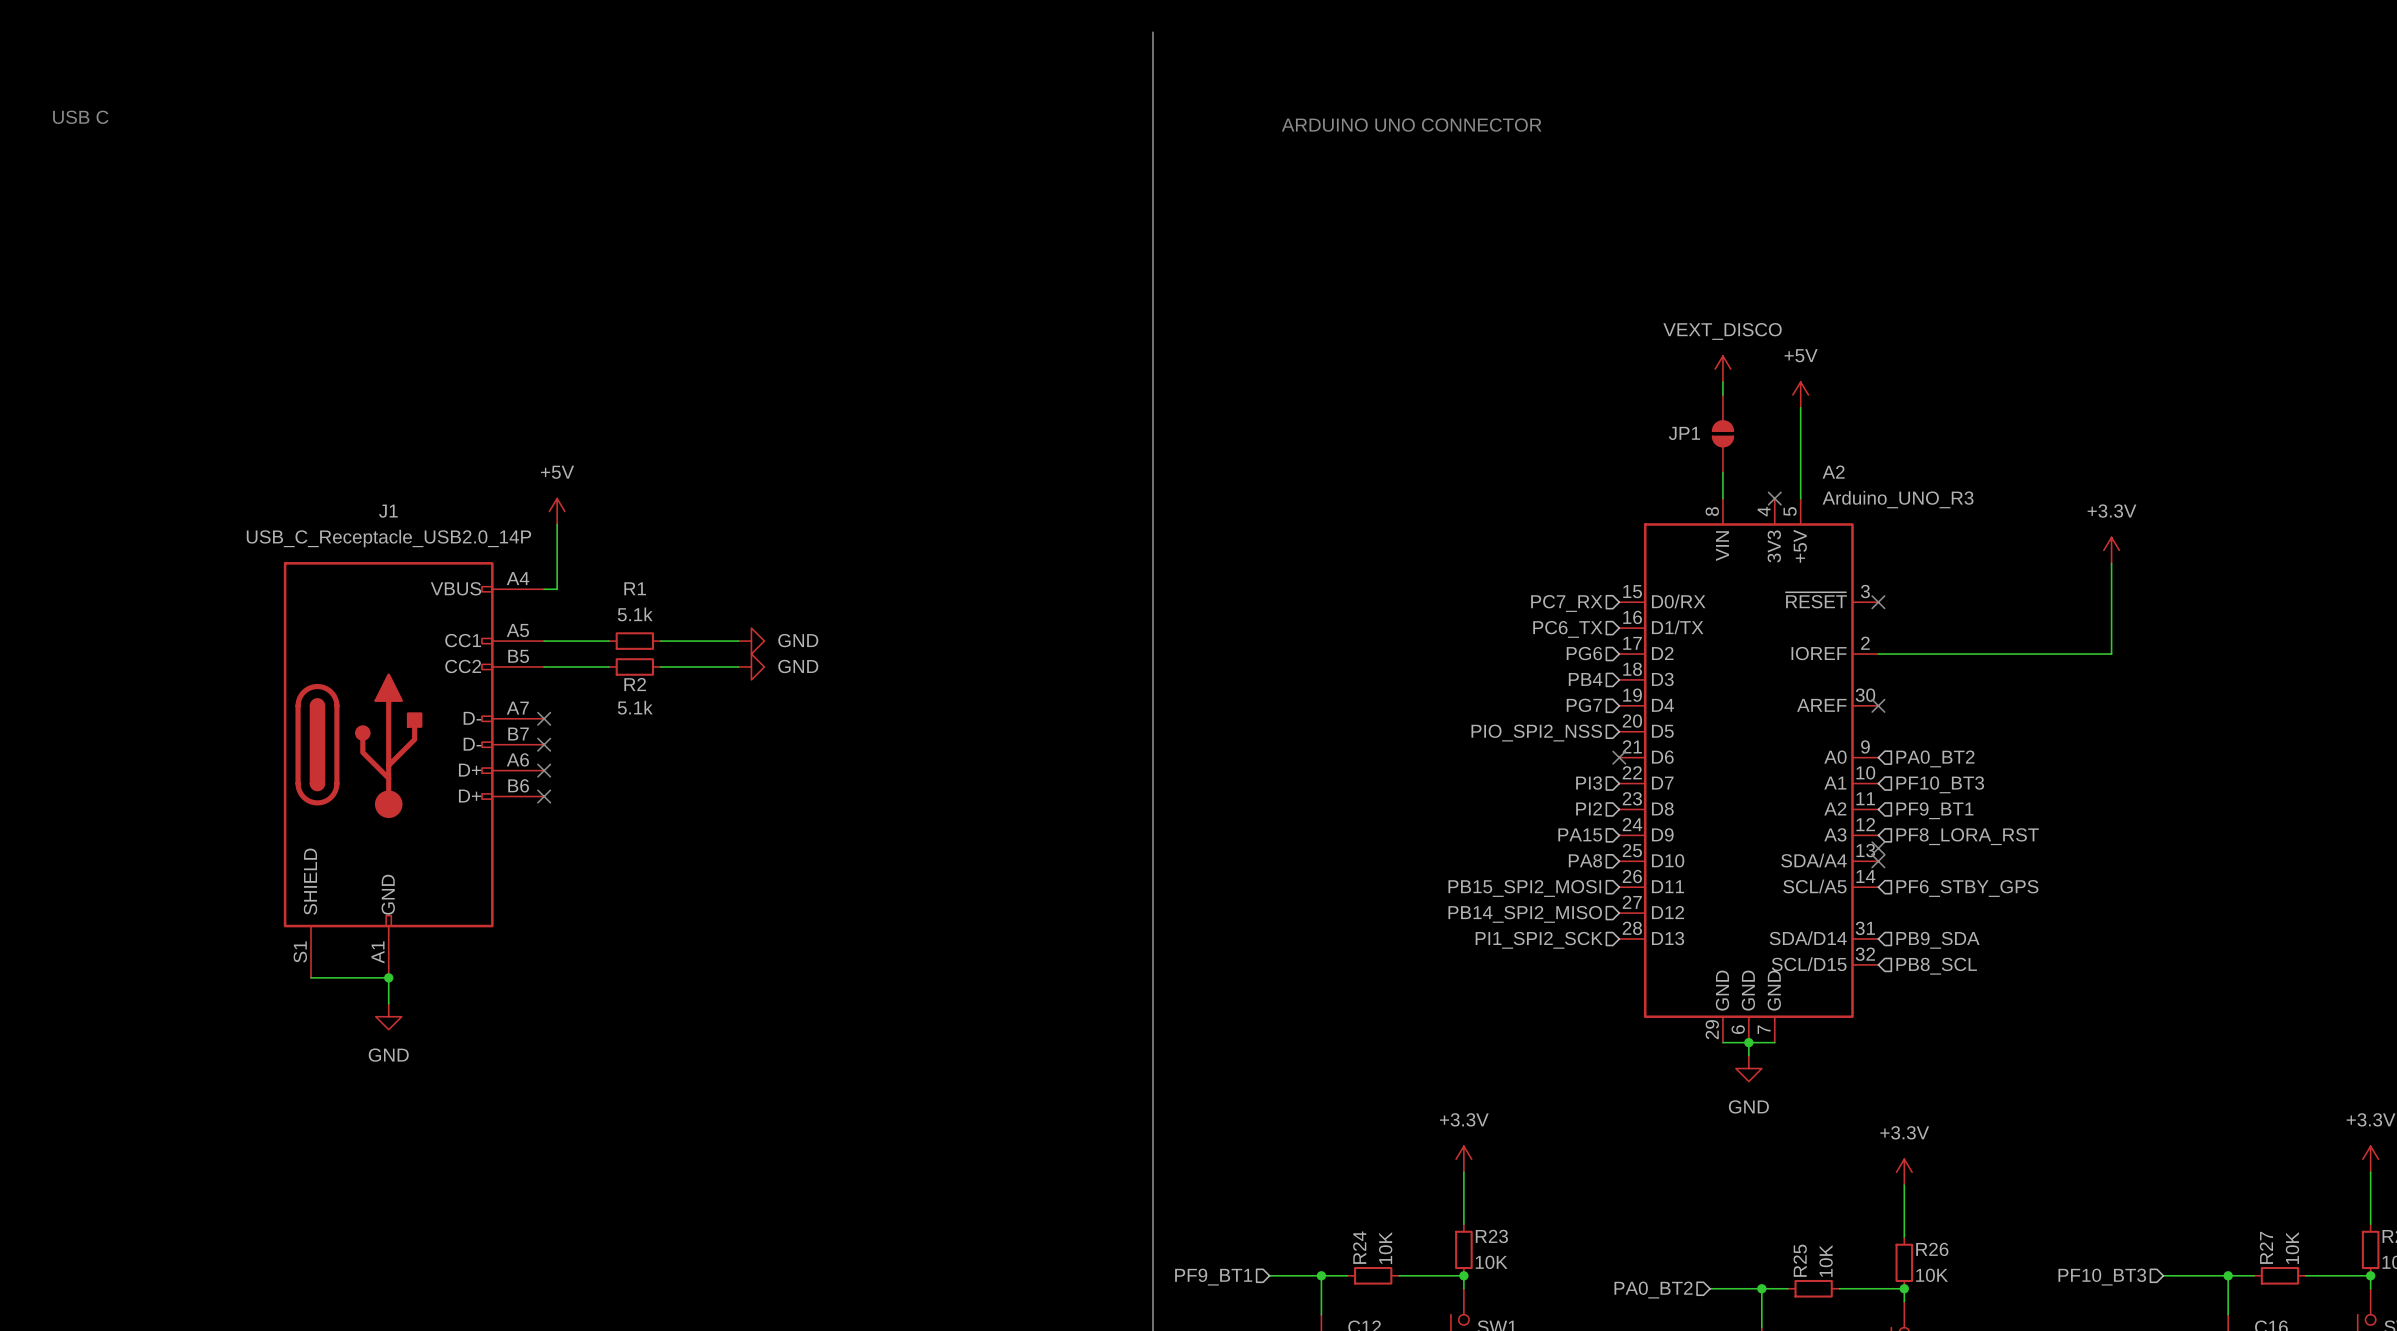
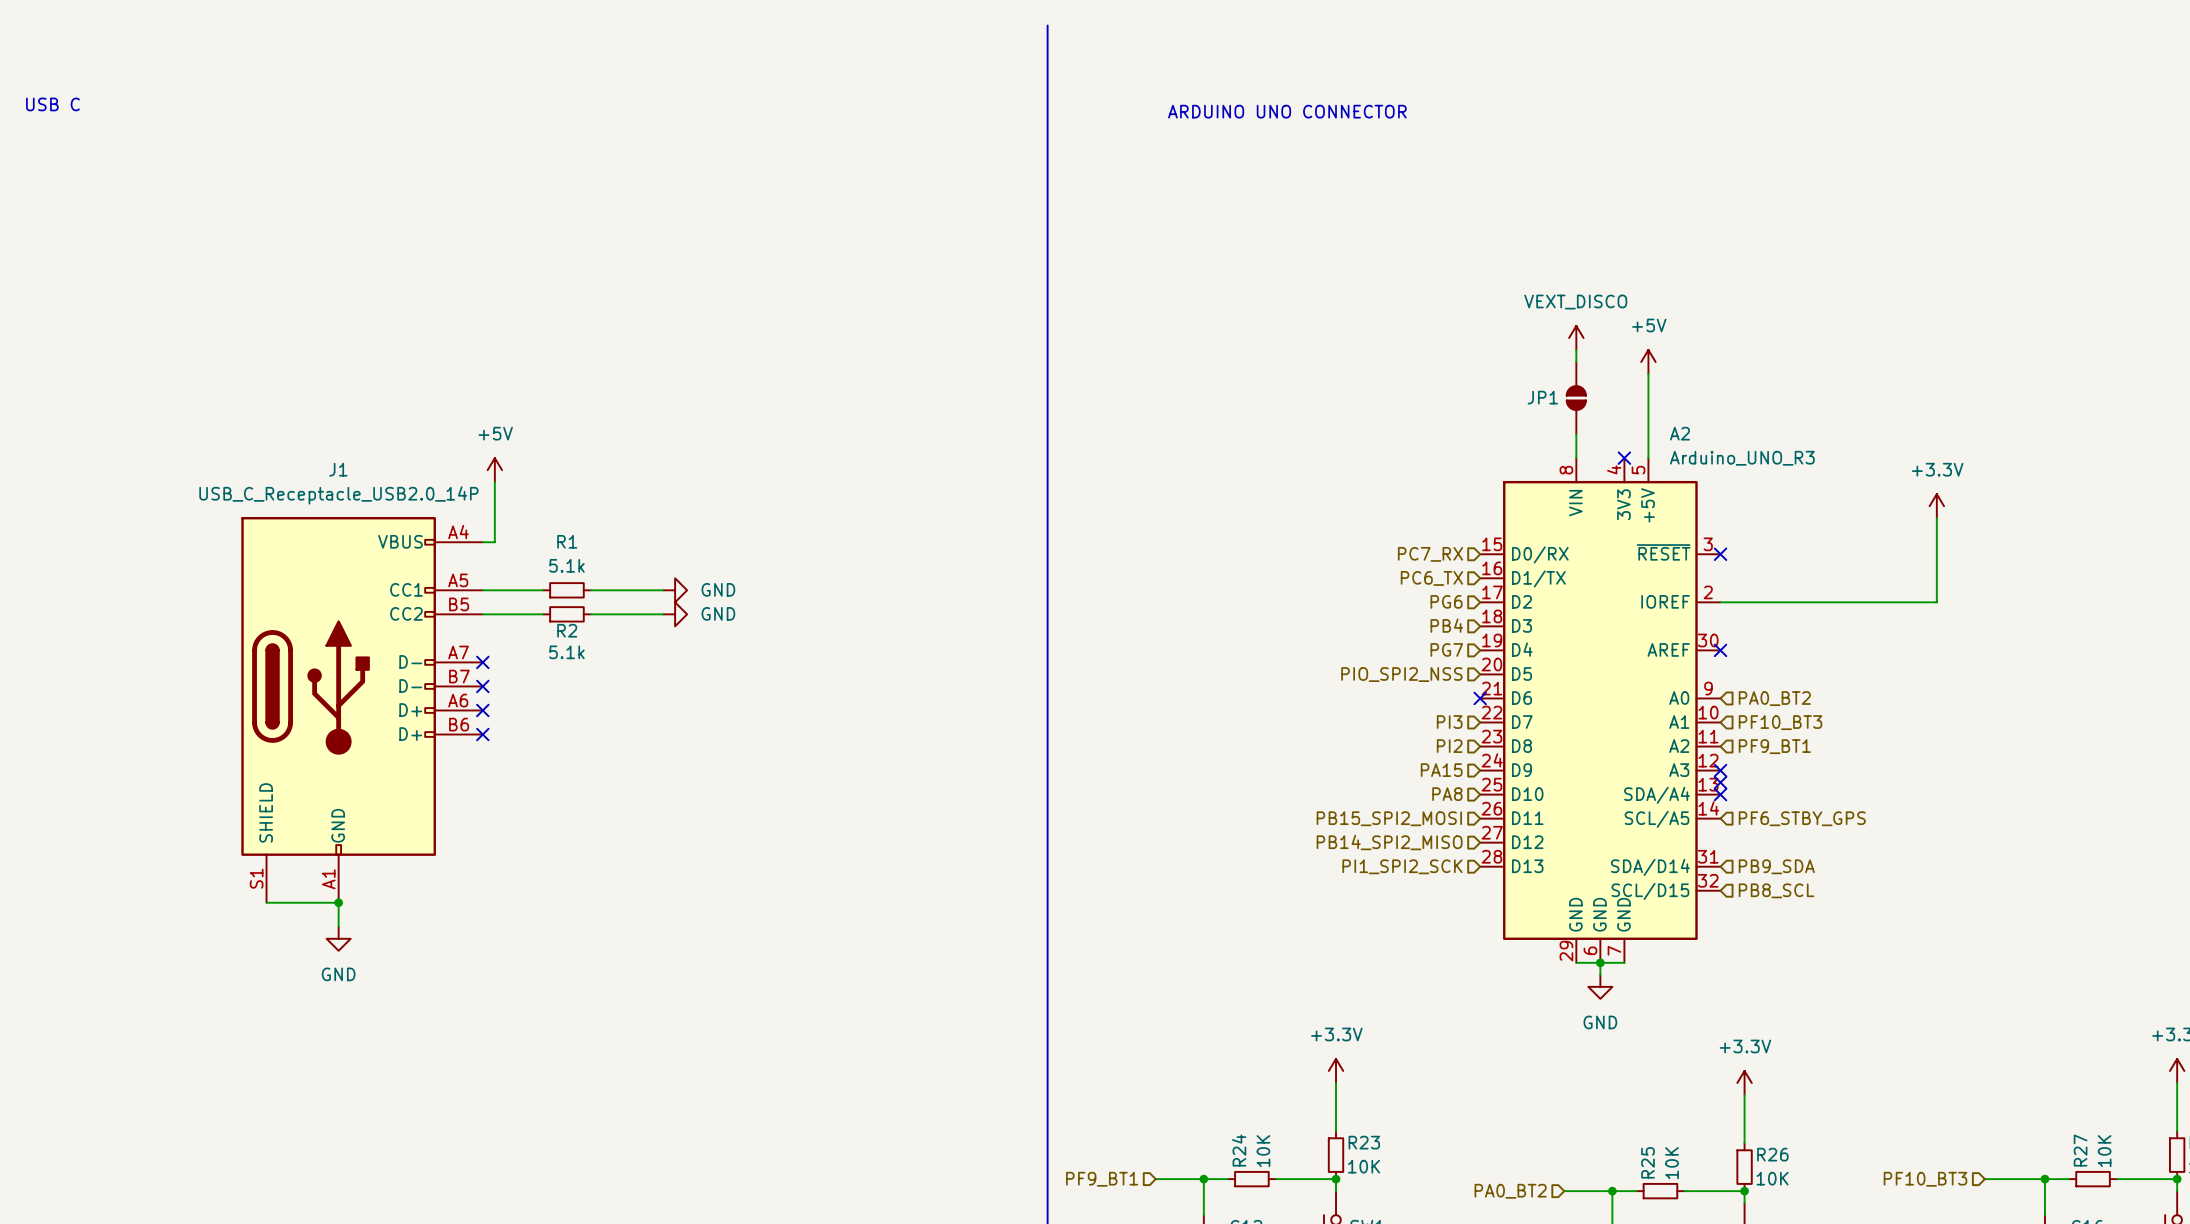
no-connect mark: none -> (1720, 770)
hierarchical label: PF8_LORA_RST (1967, 836) -> none

